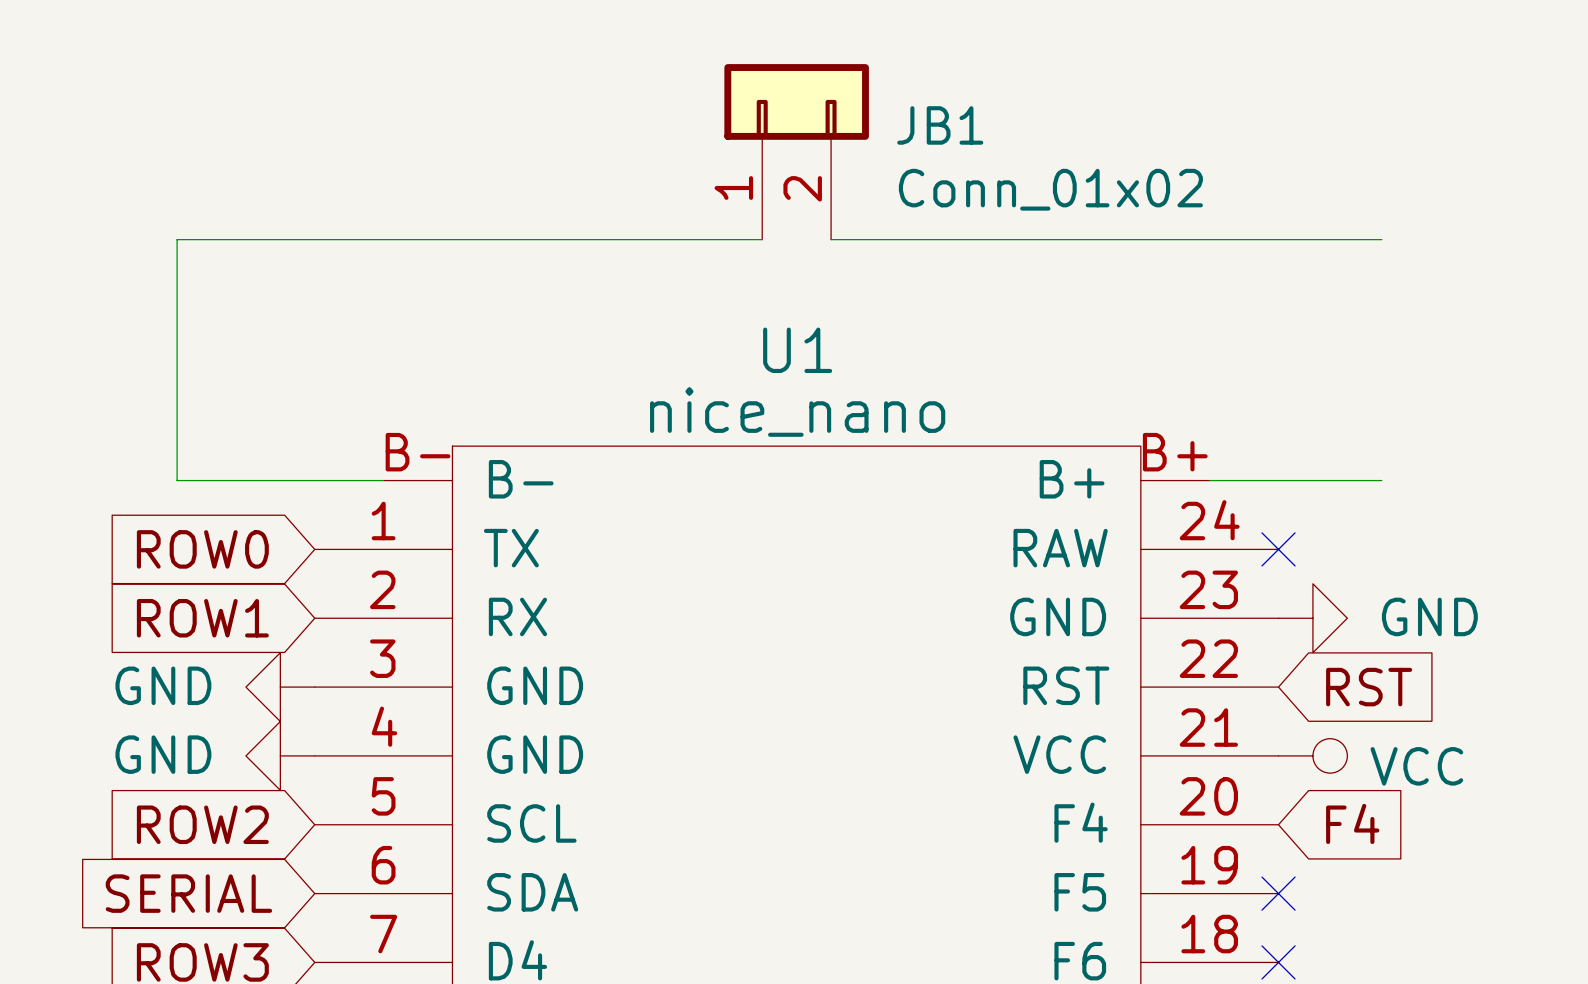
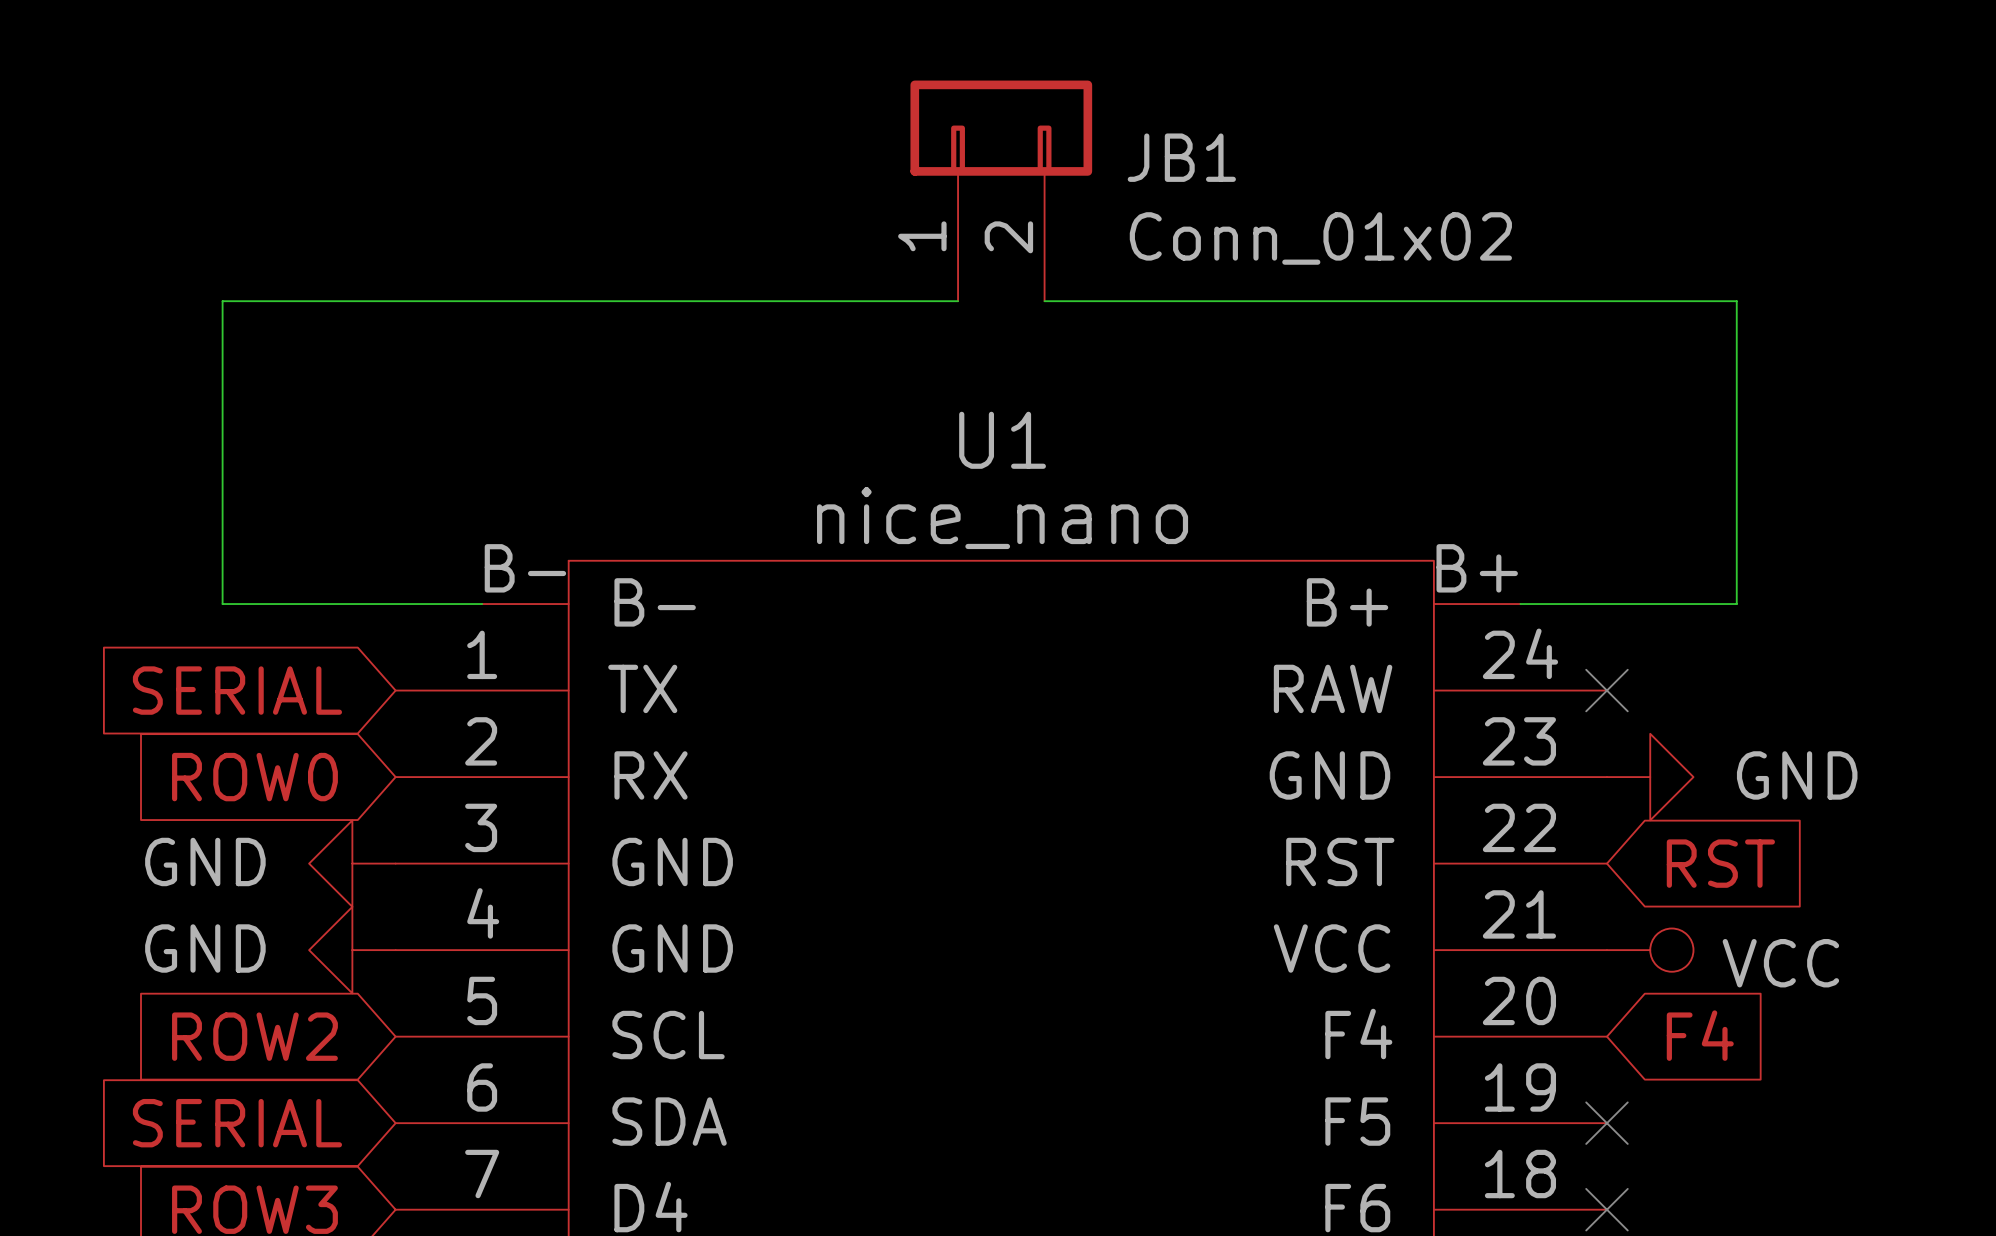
wire: none -> (1736, 301) (1736, 604)
global label: ROW0 (202, 549) -> SERIAL (237, 690)
global label: ROW1 (202, 618) -> ROW0 (254, 777)

